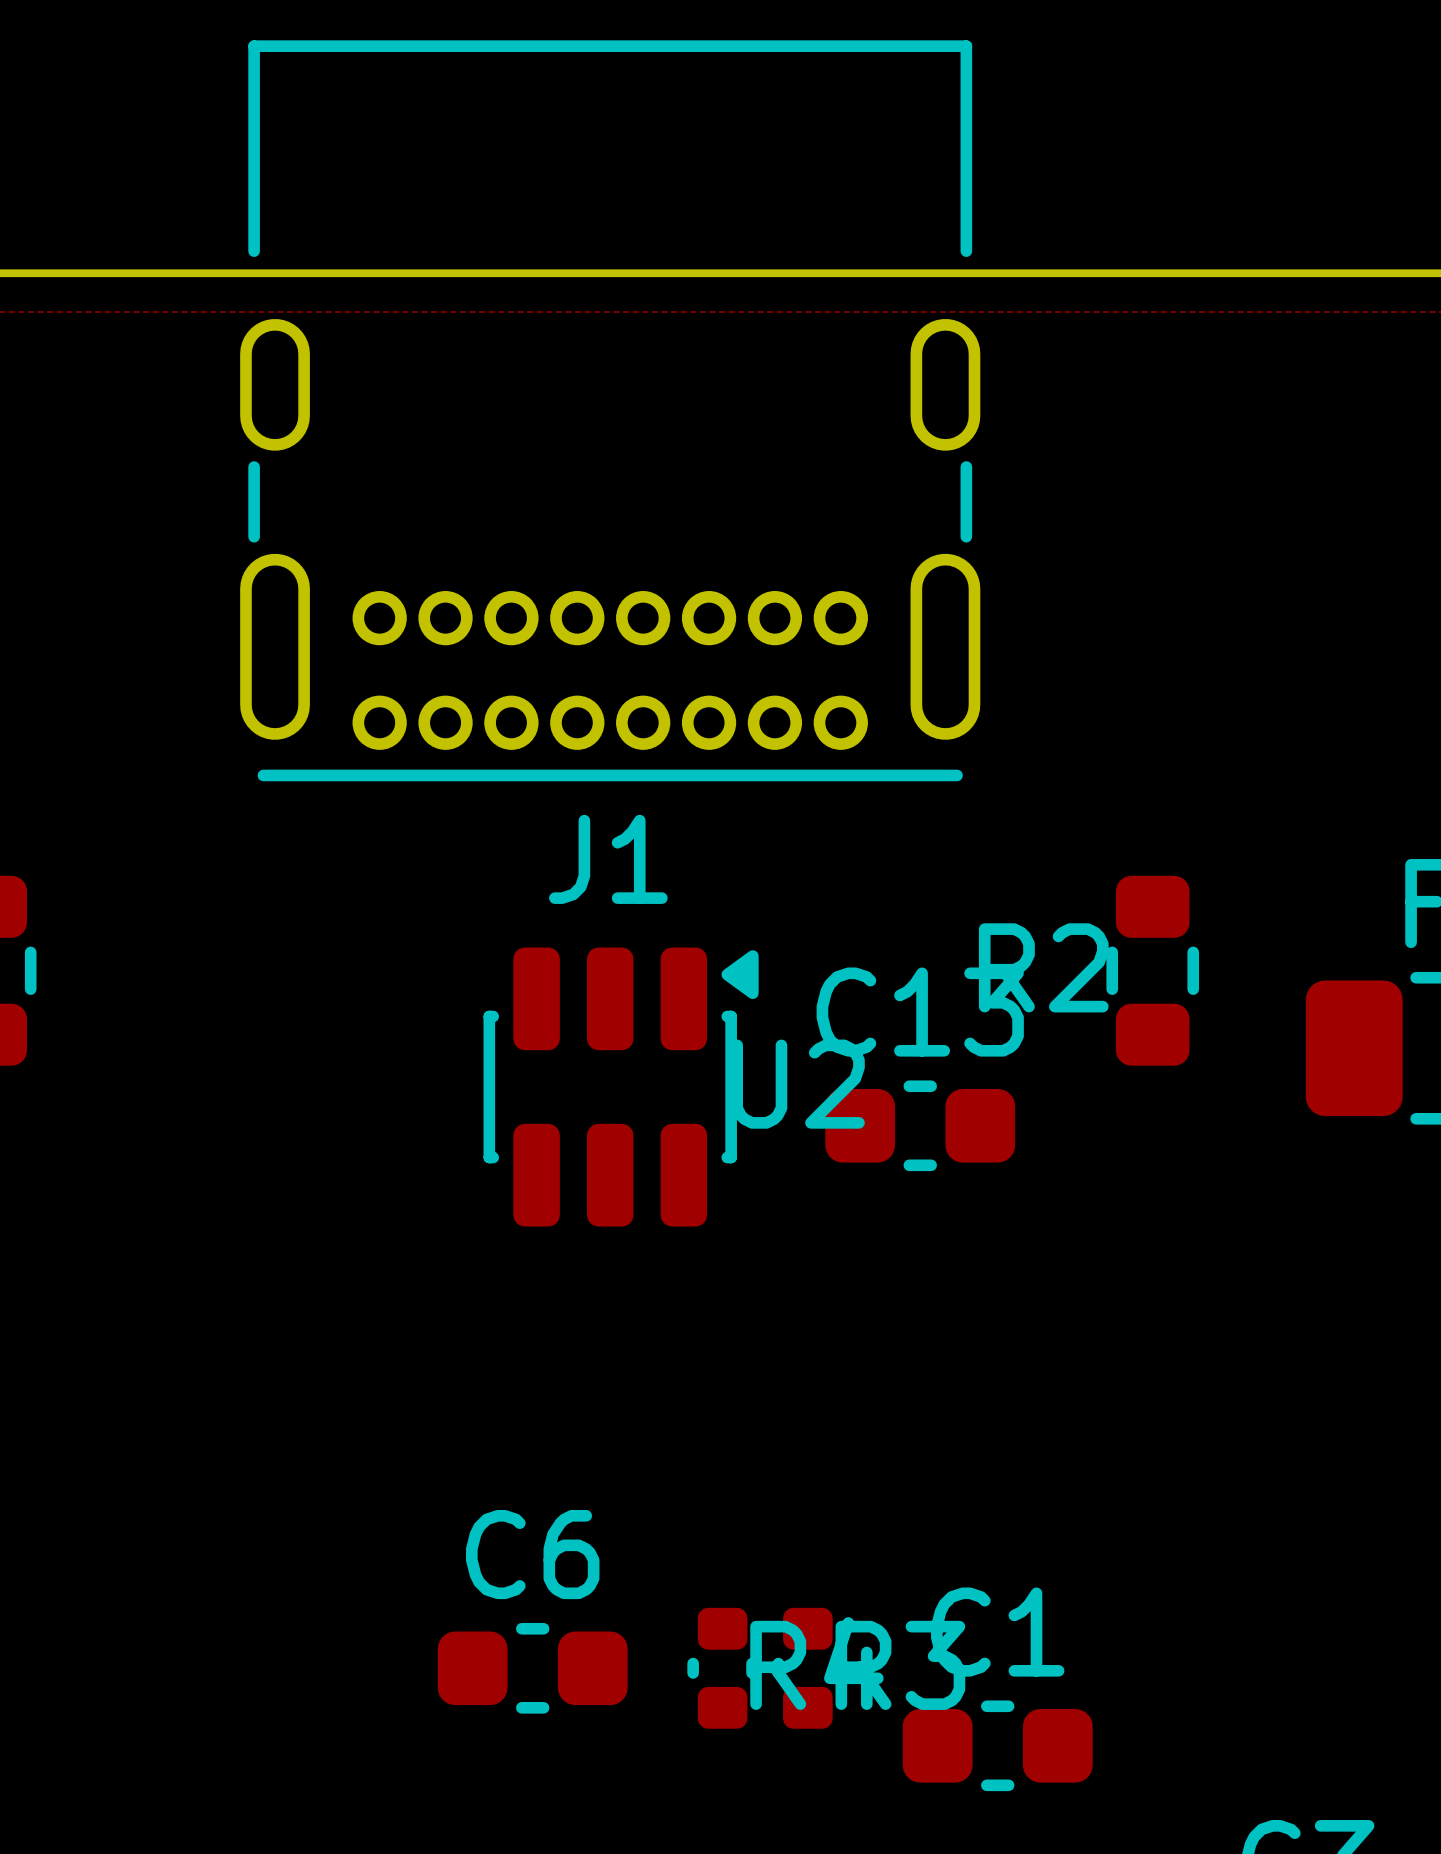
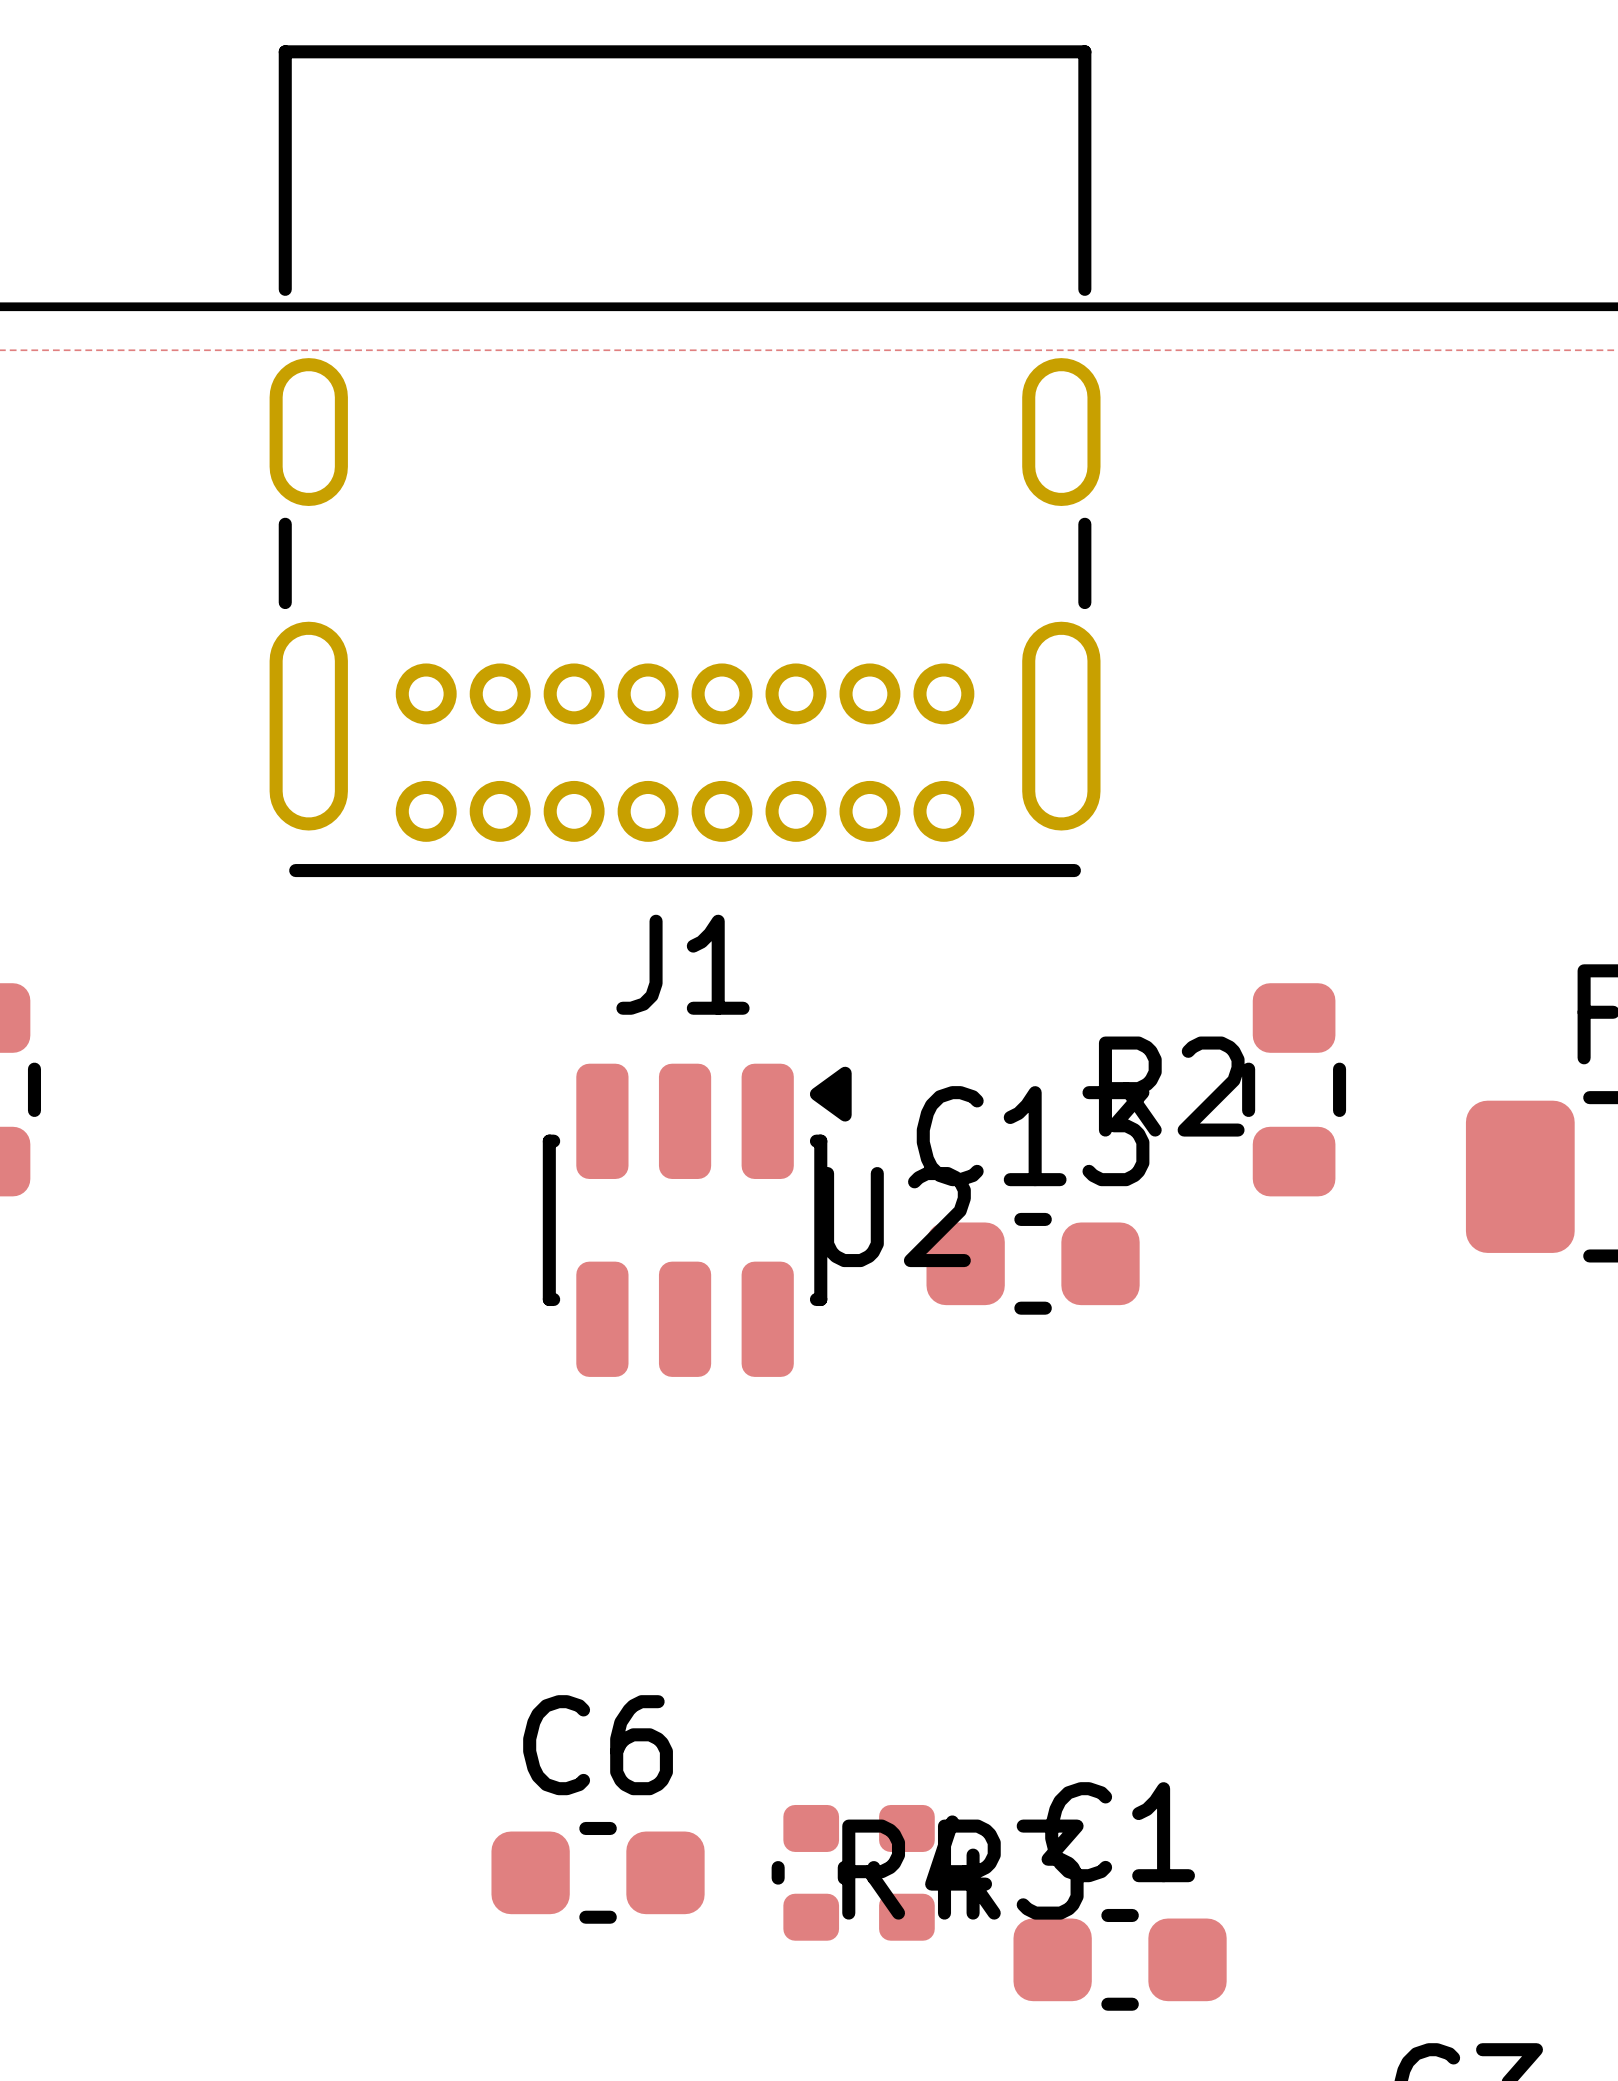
J1 footprint: [240, 40, 981, 782] -> [269, 45, 1101, 878]

